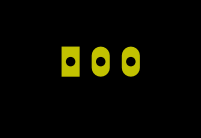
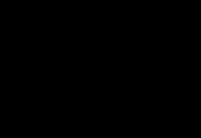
part: (100, 61) -> none

